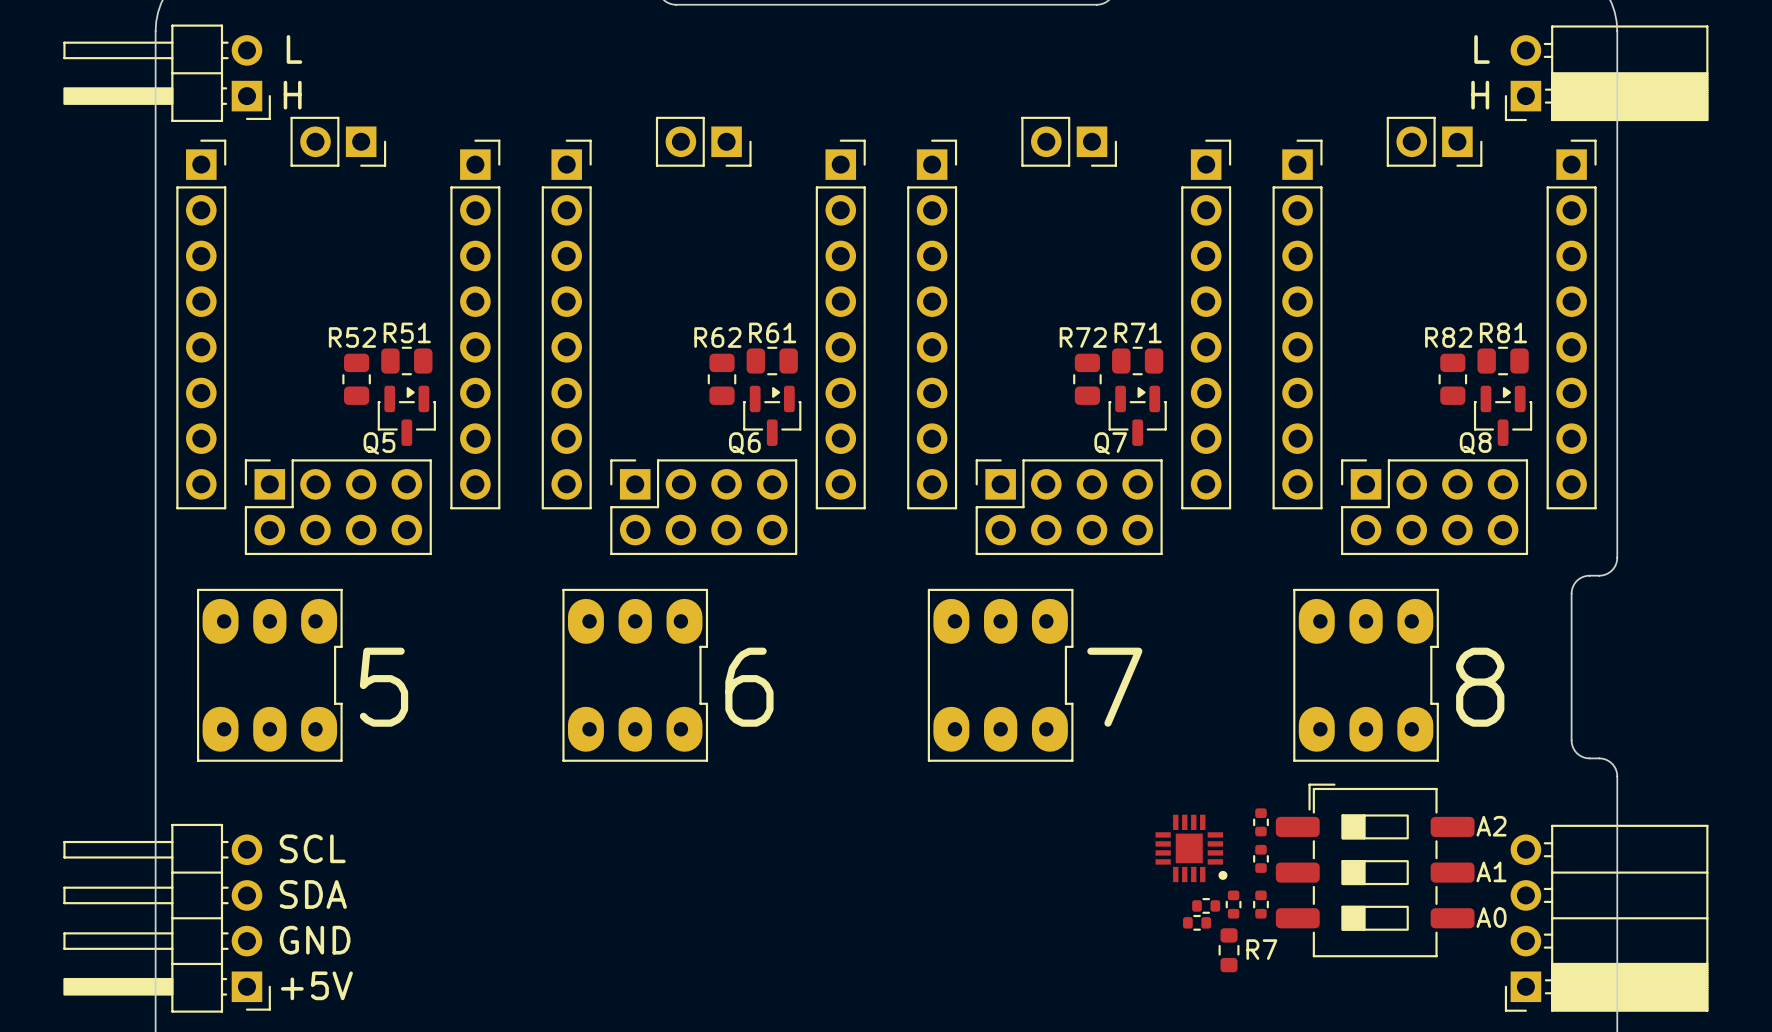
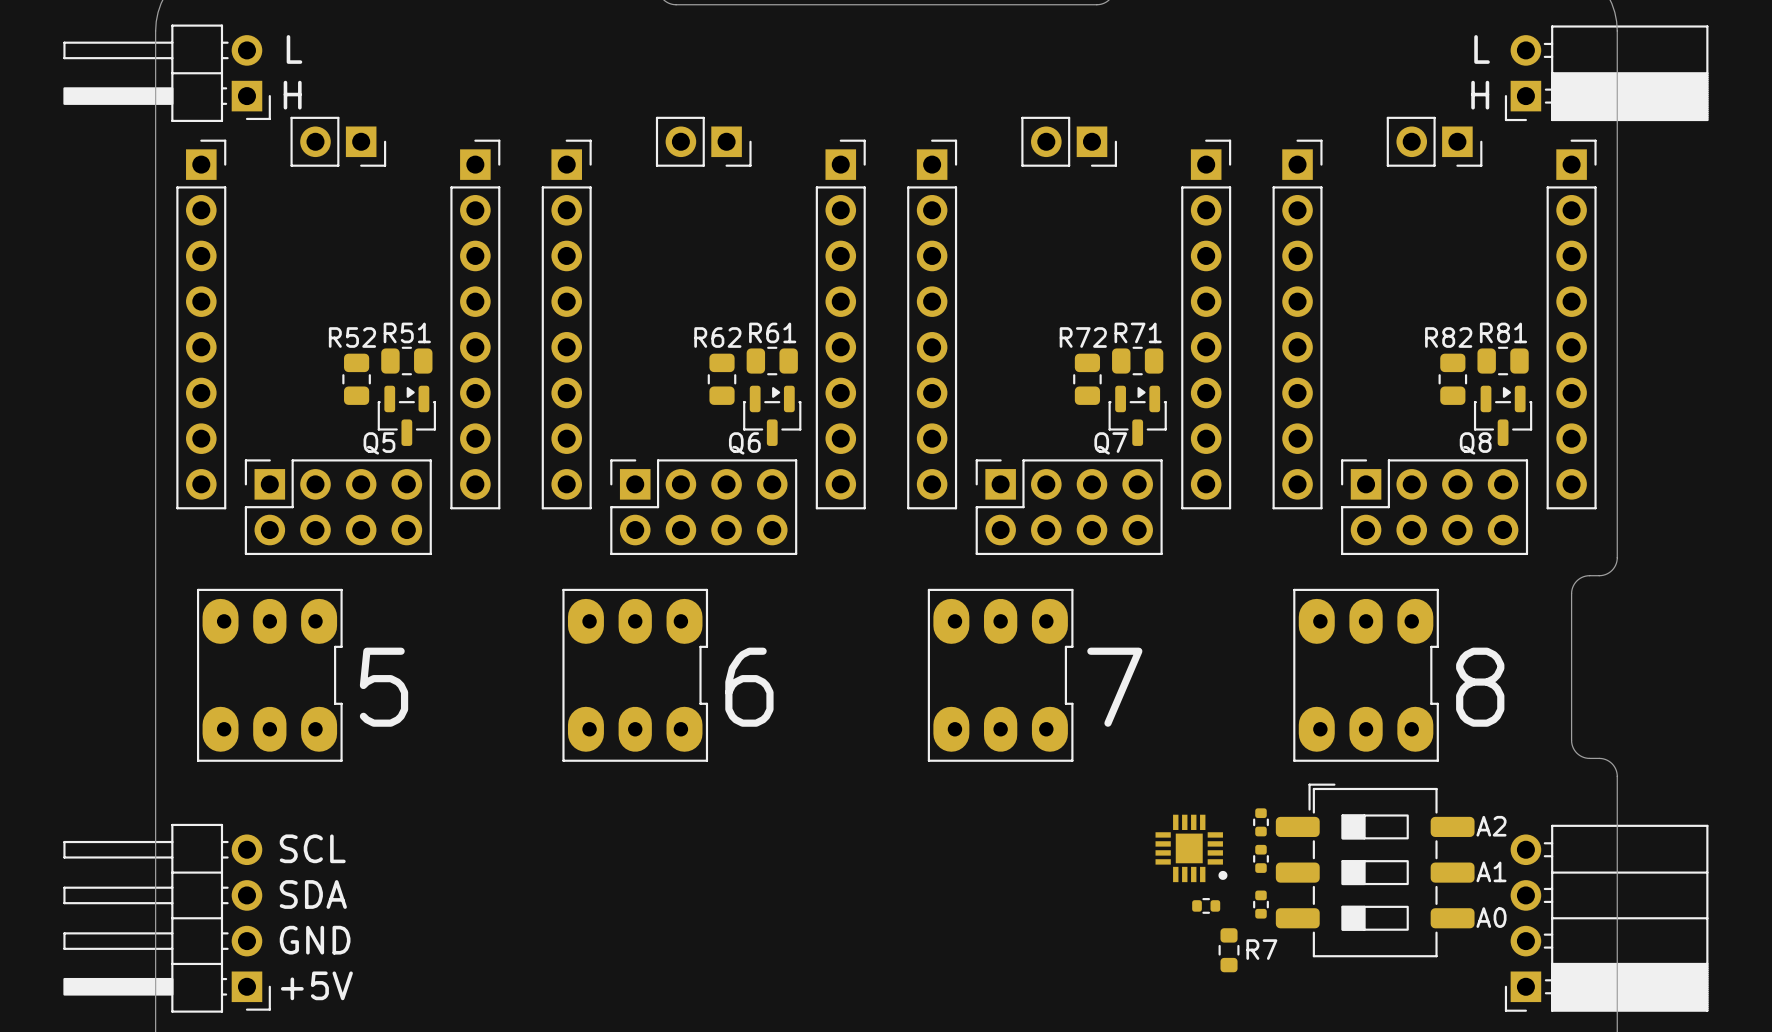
part: (1233, 904) -> none
part: (1197, 922) -> none

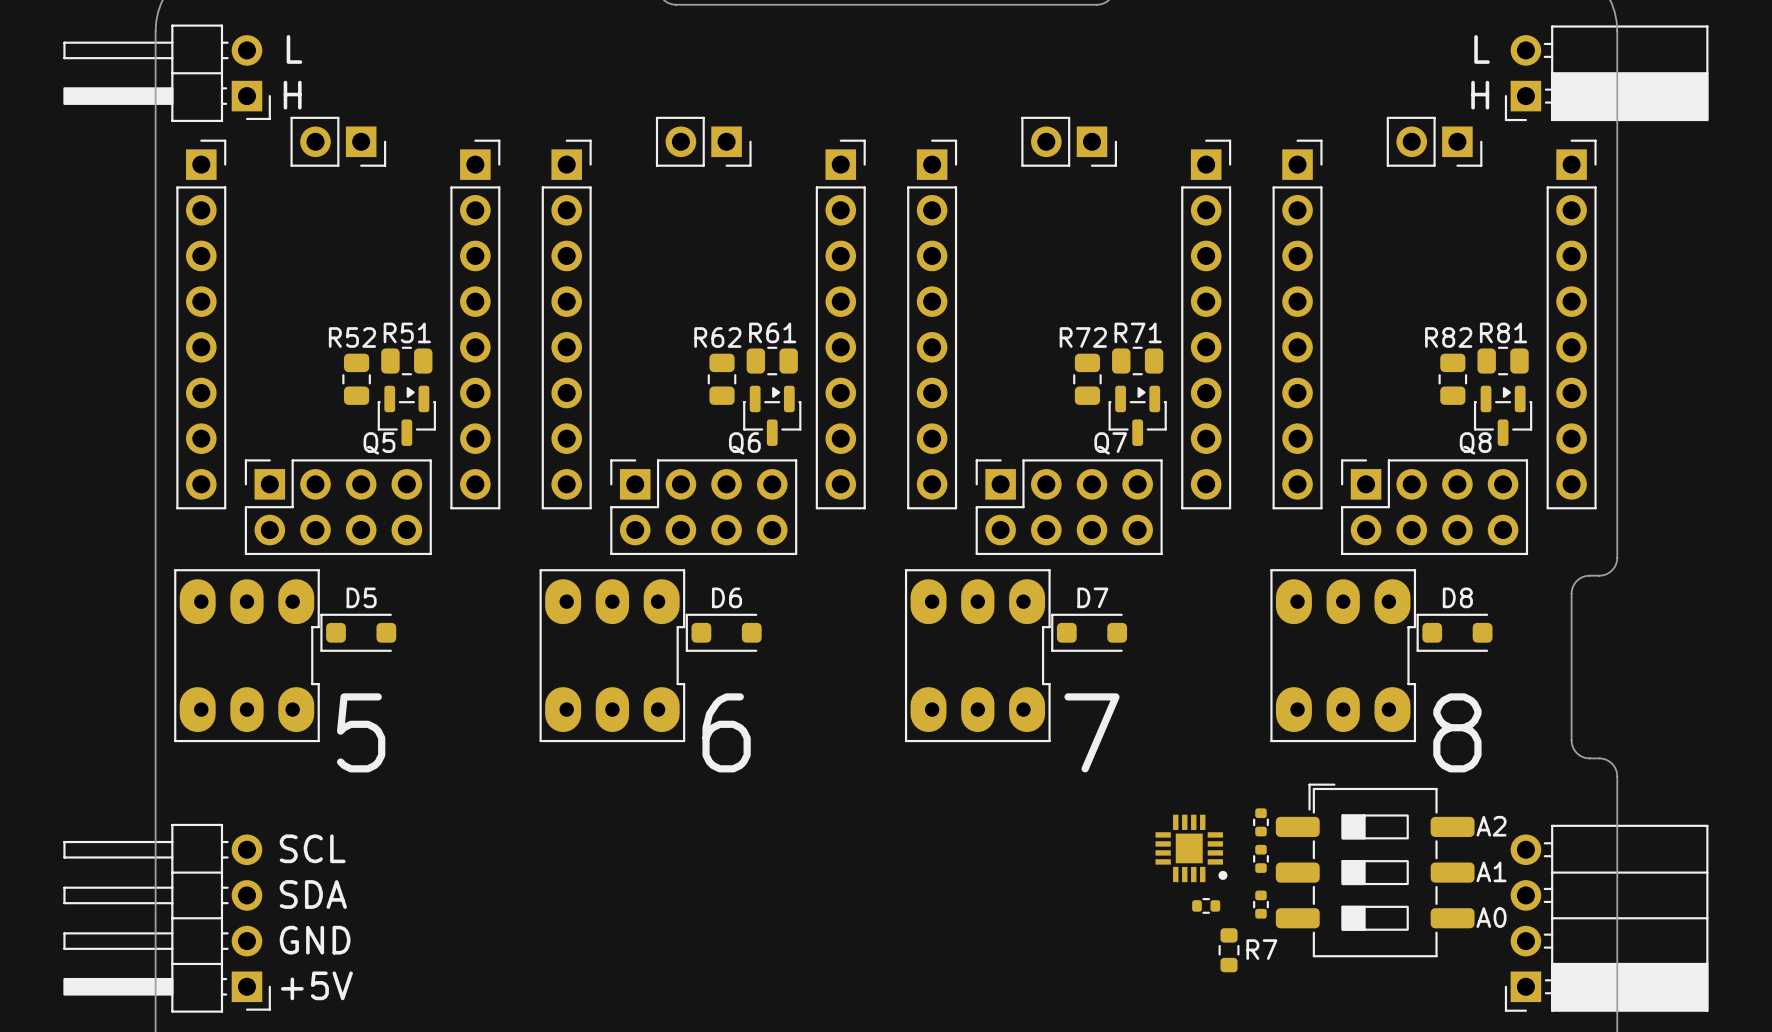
D5: none -> (358, 632)
D6: none -> (723, 632)
D7: none -> (1089, 632)
D8: none -> (1454, 632)
part position: (269, 675) -> (246, 655)
part position: (635, 675) -> (612, 655)
part position: (1000, 675) -> (977, 655)
part position: (1366, 675) -> (1343, 655)
text position: 5 (384, 687) -> 5 (361, 732)
text position: 6 (749, 687) -> 6 (726, 732)
text position: 7 (1114, 687) -> 7 (1091, 732)
text position: 8 (1480, 687) -> 8 (1457, 732)

